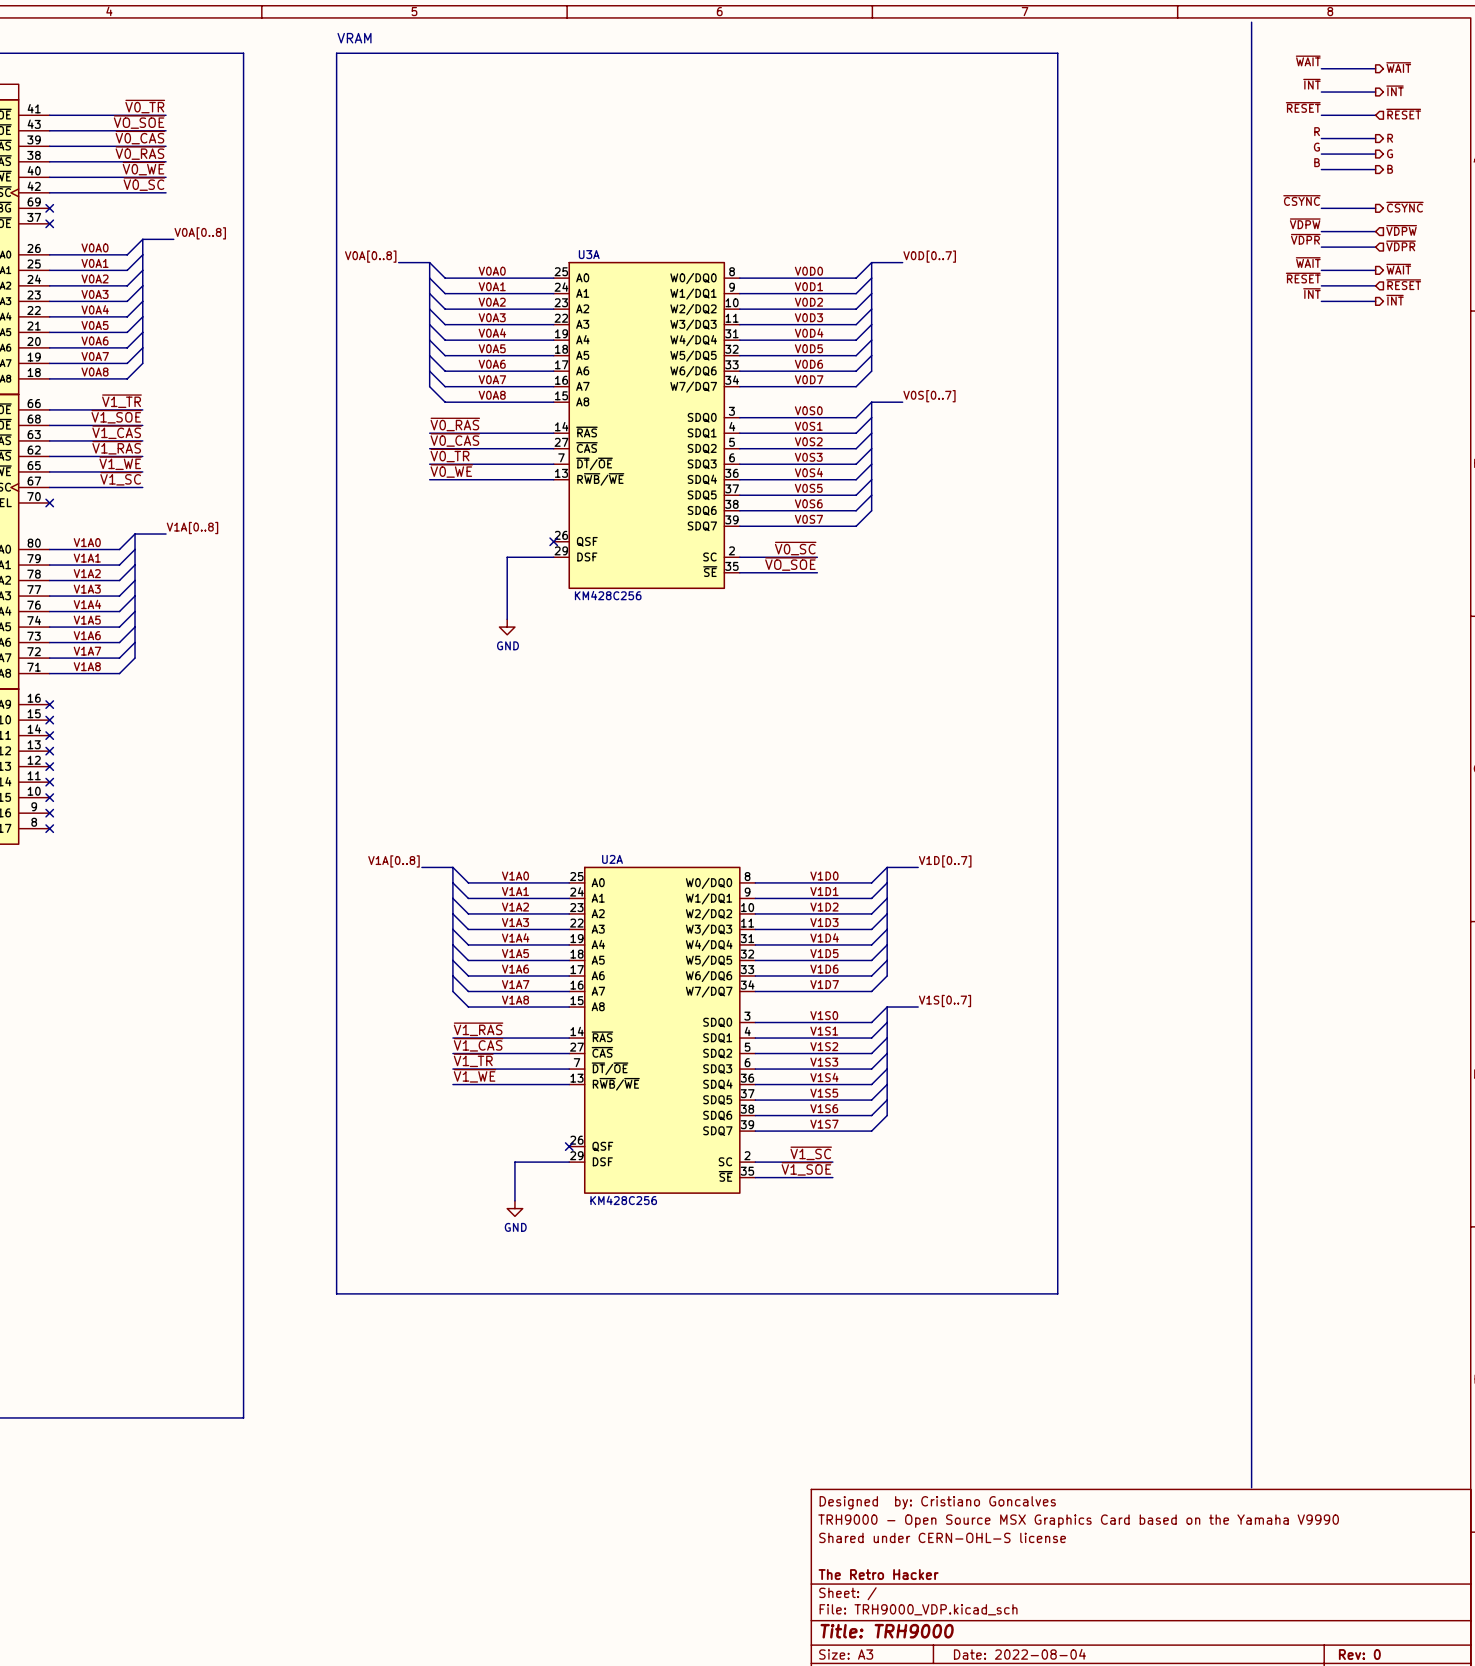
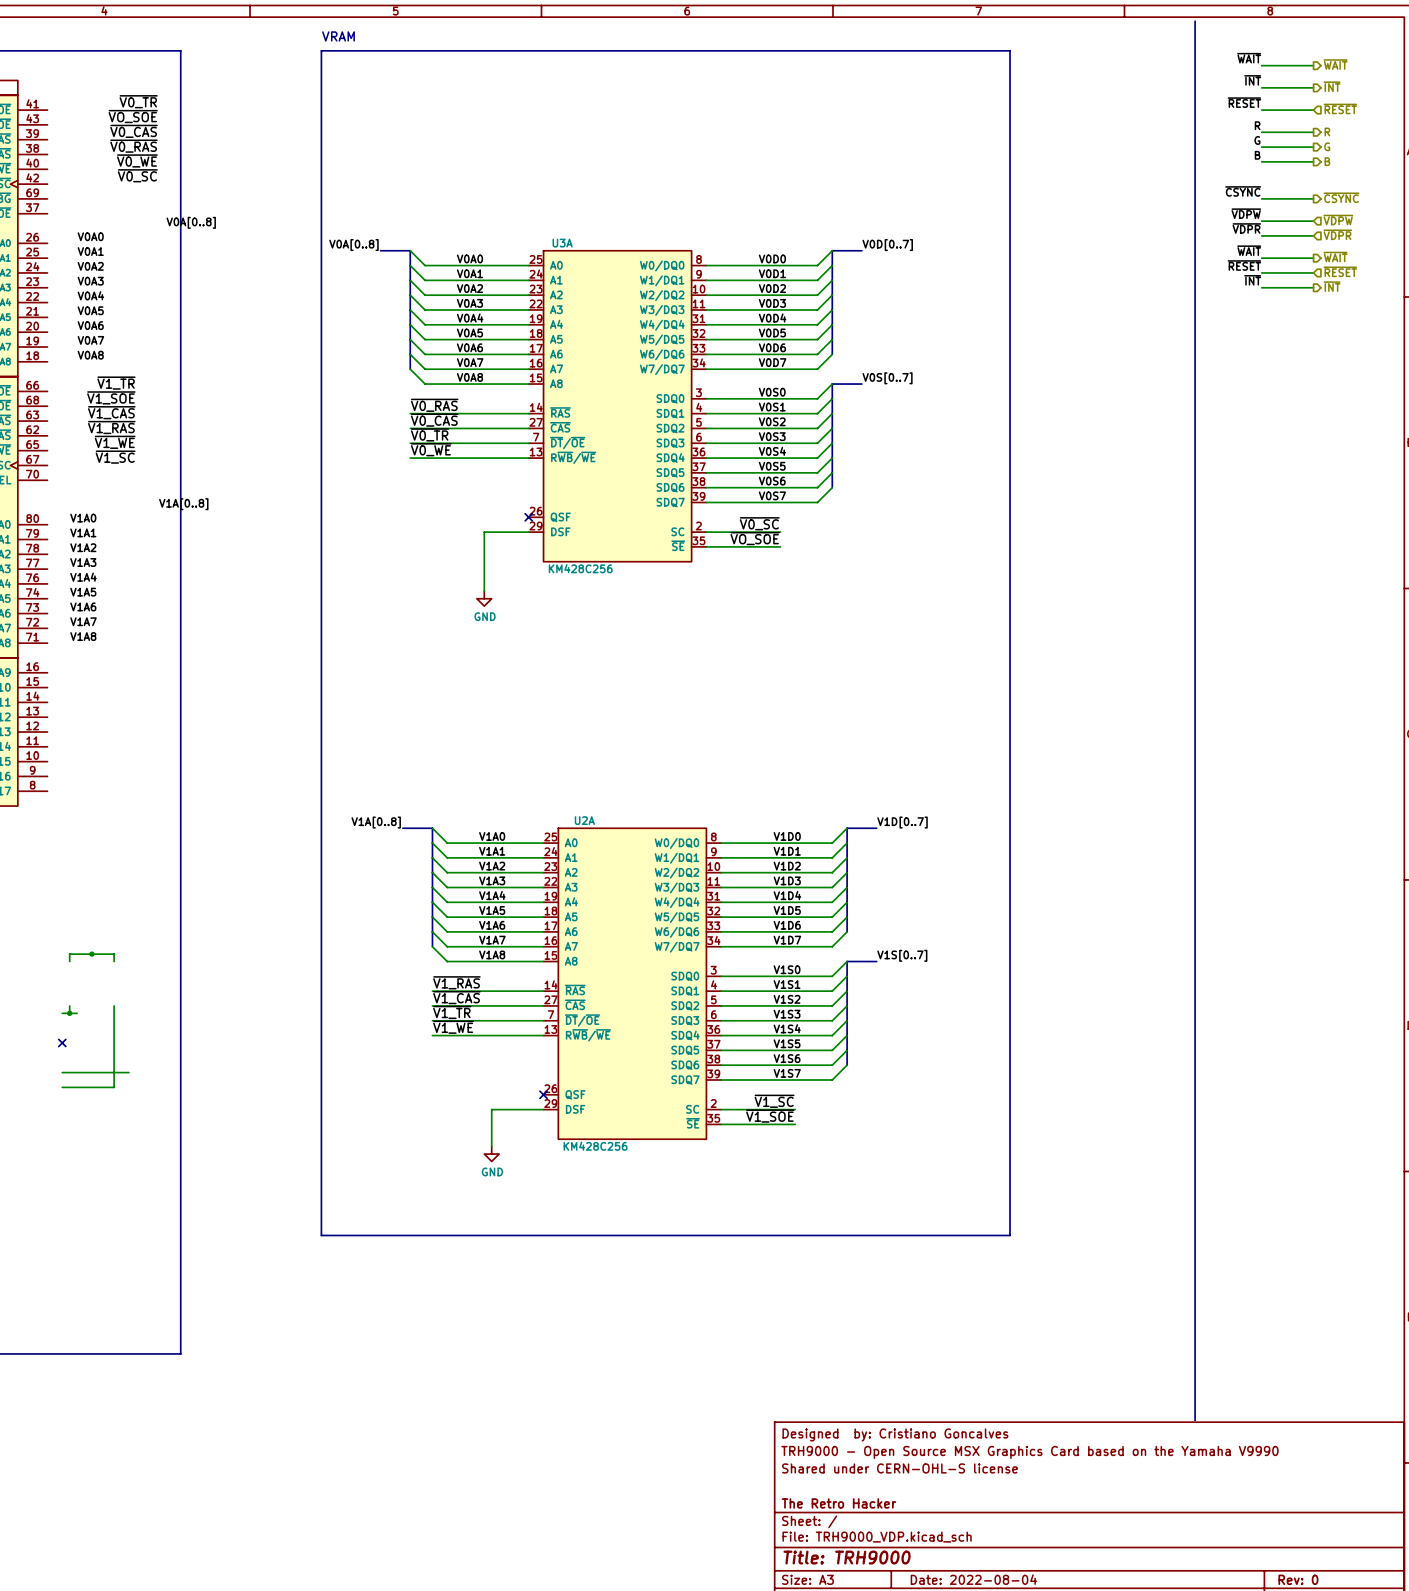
line: (189, 53) (243, 53) (243, 1417) (189, 1417) -> (180, 50) (180, 1353)
wire: (49, 115) (166, 115) -> none
wire: (49, 130) (166, 130) -> none
wire: (49, 146) (166, 146) -> none
wire: (49, 161) (166, 161) -> none
wire: (49, 177) (166, 177) -> none
wire: (49, 192) (166, 192) -> none
no-connect mark: (49, 208) -> none
no-connect mark: (49, 223) -> none
wire: (142, 239) (127, 254) (49, 254) -> none
bus: (173, 239) (142, 239) (142, 363) -> none
wire: (142, 254) (127, 270) (49, 270) -> none
wire: (142, 270) (127, 285) (49, 285) -> none
wire: (142, 285) (127, 301) (49, 301) -> none
wire: (142, 301) (127, 316) (49, 316) -> none
wire: (142, 316) (127, 332) (49, 332) -> none
wire: (142, 332) (127, 347) (49, 347) -> none
wire: (142, 347) (127, 363) (49, 363) -> none
wire: (142, 363) (127, 378) (49, 378) -> none
wire: (49, 409) (142, 409) -> none
wire: (49, 425) (142, 425) -> none
wire: (49, 440) (142, 440) -> none
wire: (49, 456) (142, 456) -> none
wire: (49, 471) (142, 471) -> none
wire: (49, 487) (142, 487) -> none
no-connect mark: (49, 502) -> none
wire: (135, 534) (119, 549) (49, 549) -> none
bus: (166, 534) (135, 534) (135, 658) -> none
wire: (135, 549) (119, 565) (49, 565) -> none
wire: (135, 565) (119, 580) (49, 580) -> none
wire: (135, 580) (119, 596) (49, 596) -> none
wire: (135, 596) (119, 611) (49, 611) -> none
wire: (135, 611) (119, 627) (49, 627) -> none
wire: (135, 627) (119, 642) (49, 642) -> none
wire: (135, 642) (119, 658) (49, 658) -> none
wire: (135, 658) (119, 673) (49, 673) -> none
no-connect mark: (49, 704) -> none
no-connect mark: (49, 720) -> none
no-connect mark: (49, 735) -> none
no-connect mark: (49, 751) -> none
no-connect mark: (49, 766) -> none
no-connect mark: (49, 782) -> none
no-connect mark: (49, 797) -> none
no-connect mark: (49, 813) -> none
no-connect mark: (49, 828) -> none
junction: none -> (91, 954)
wire: none -> (69, 961) (69, 954) (114, 954) (114, 961)
wire: none -> (69, 1005) (69, 1013)
wire: none -> (114, 1005) (114, 1087) (62, 1087)
wire: none -> (62, 1013) (77, 1013)
junction: none -> (69, 1013)
no-connect mark: none -> (62, 1042)
wire: none -> (62, 1072) (128, 1072)

